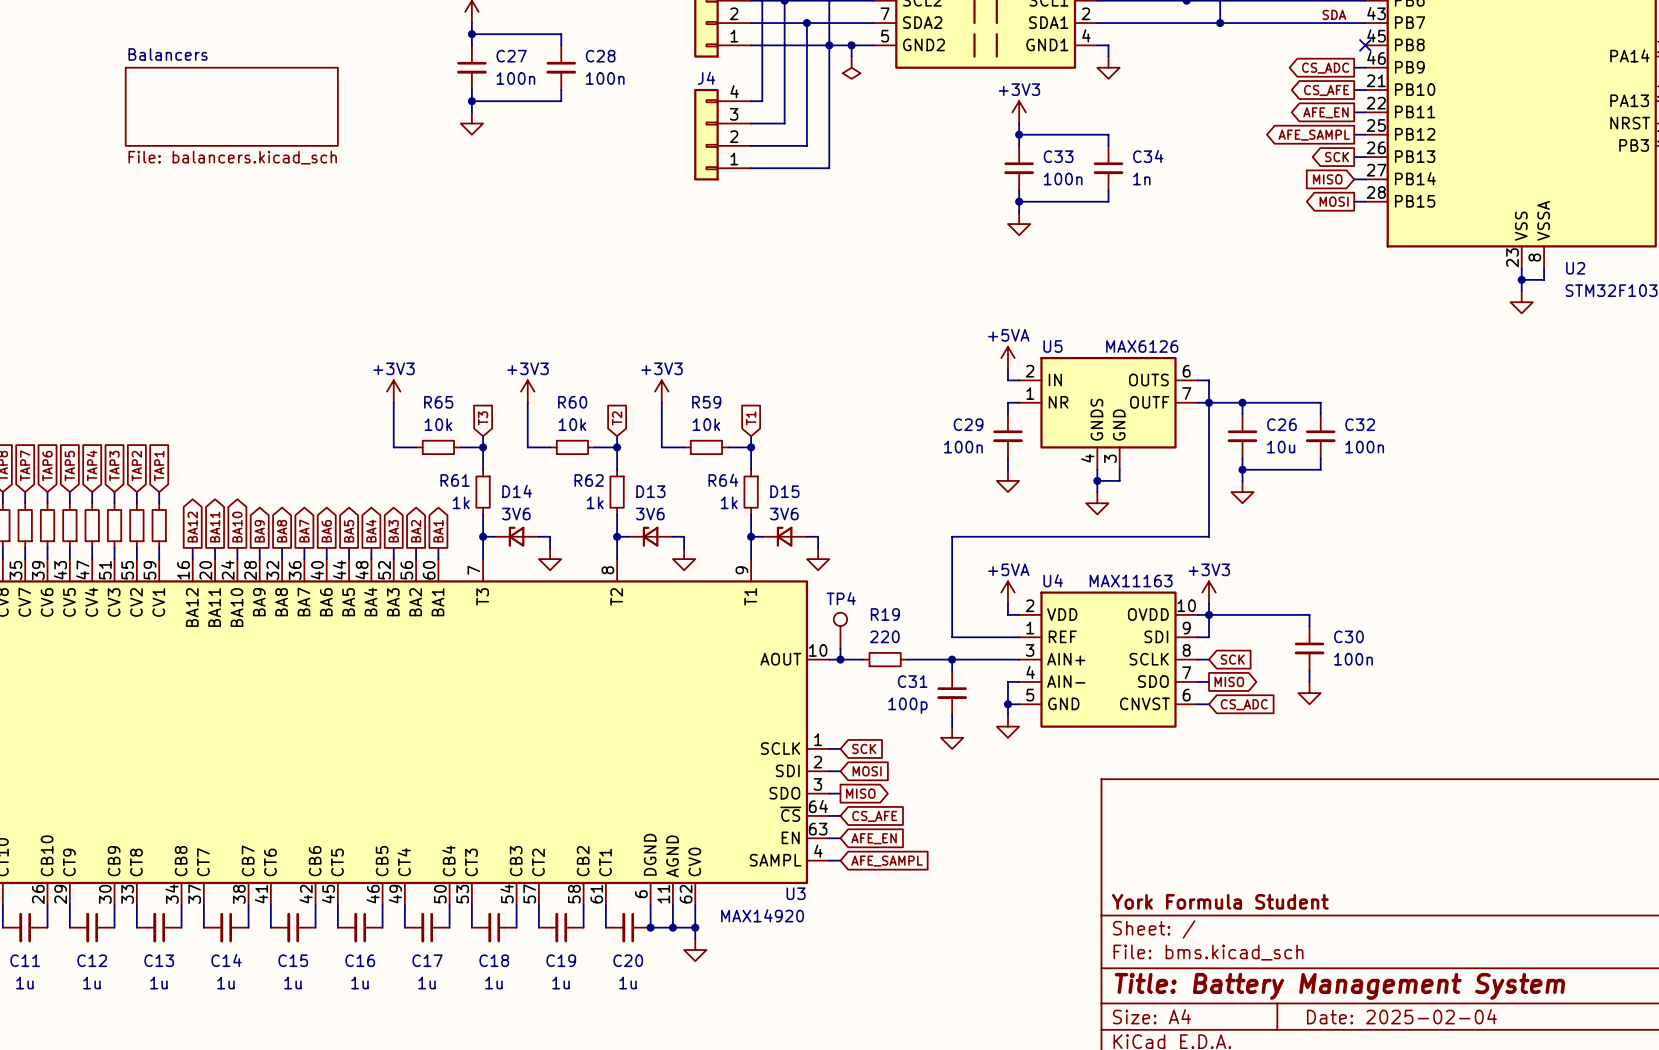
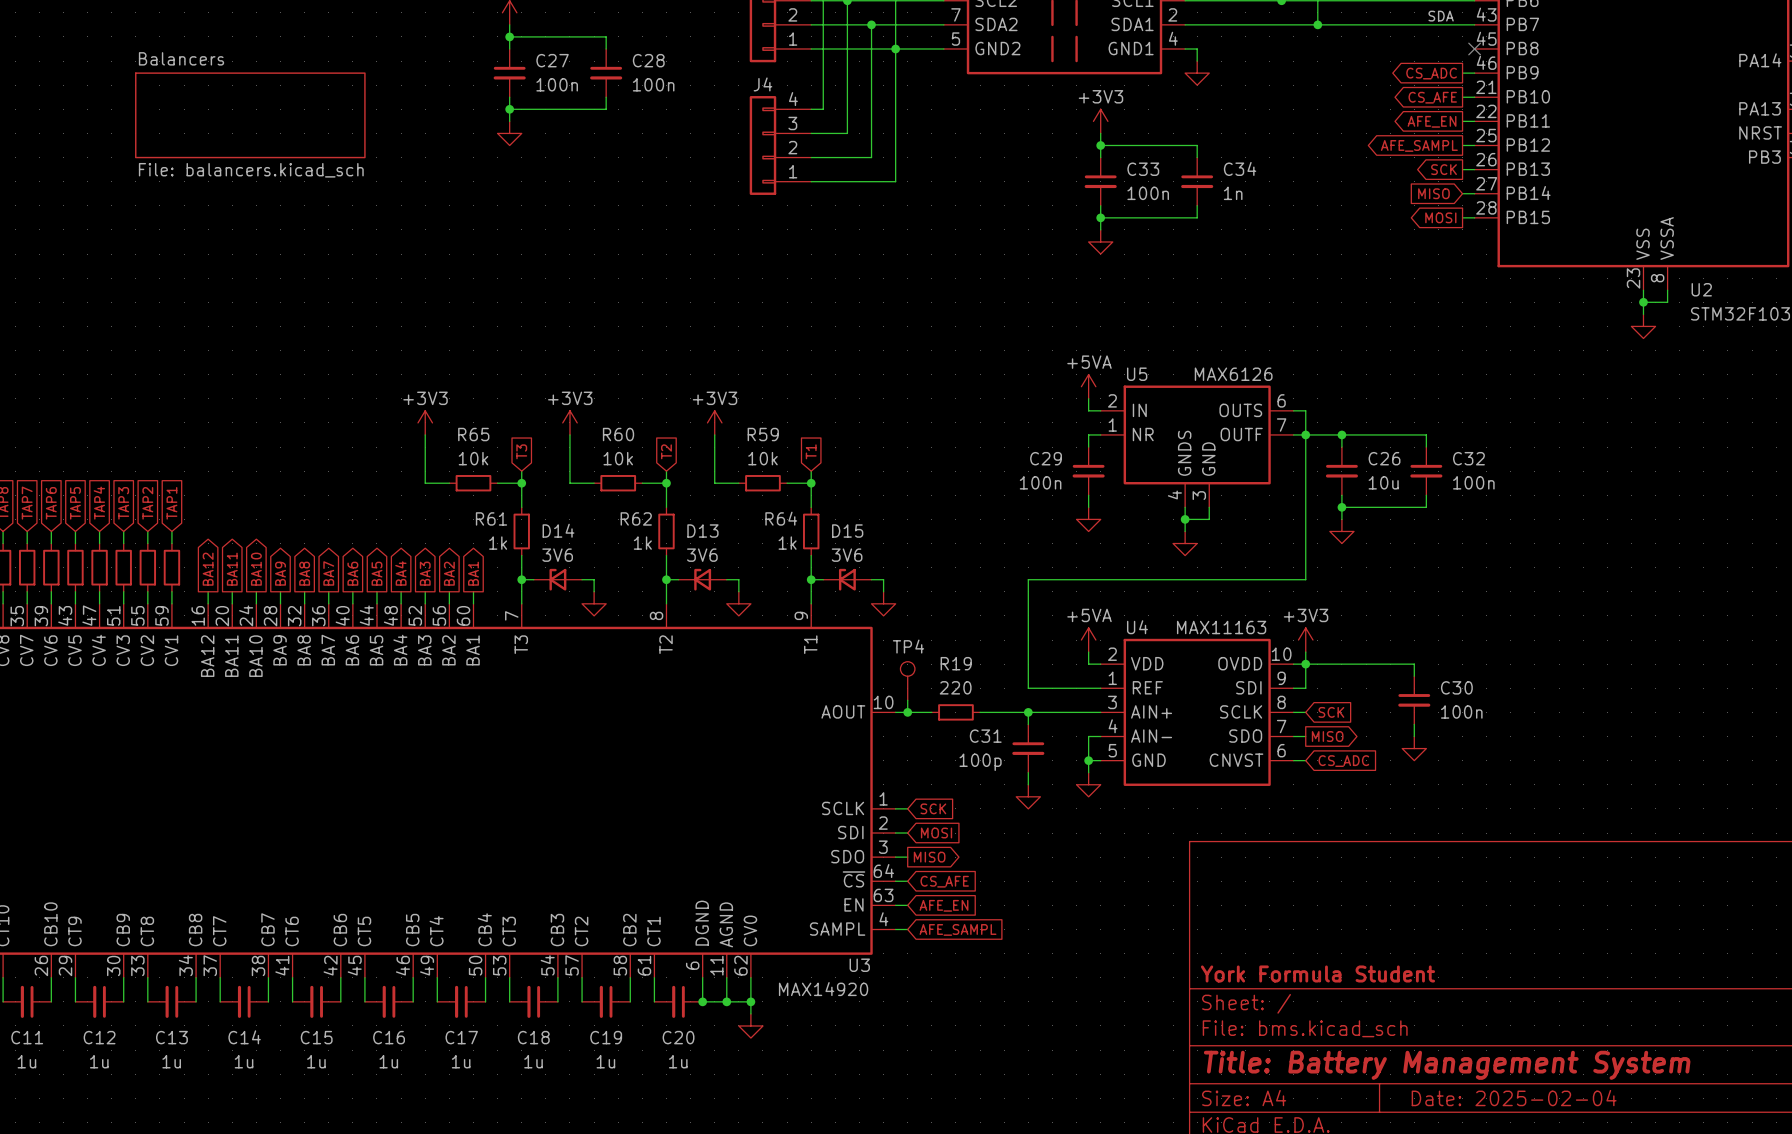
wire: (851, 45) (851, 56) -> none
junction: (851, 45) -> none
power symbol: (851, 67) -> none

